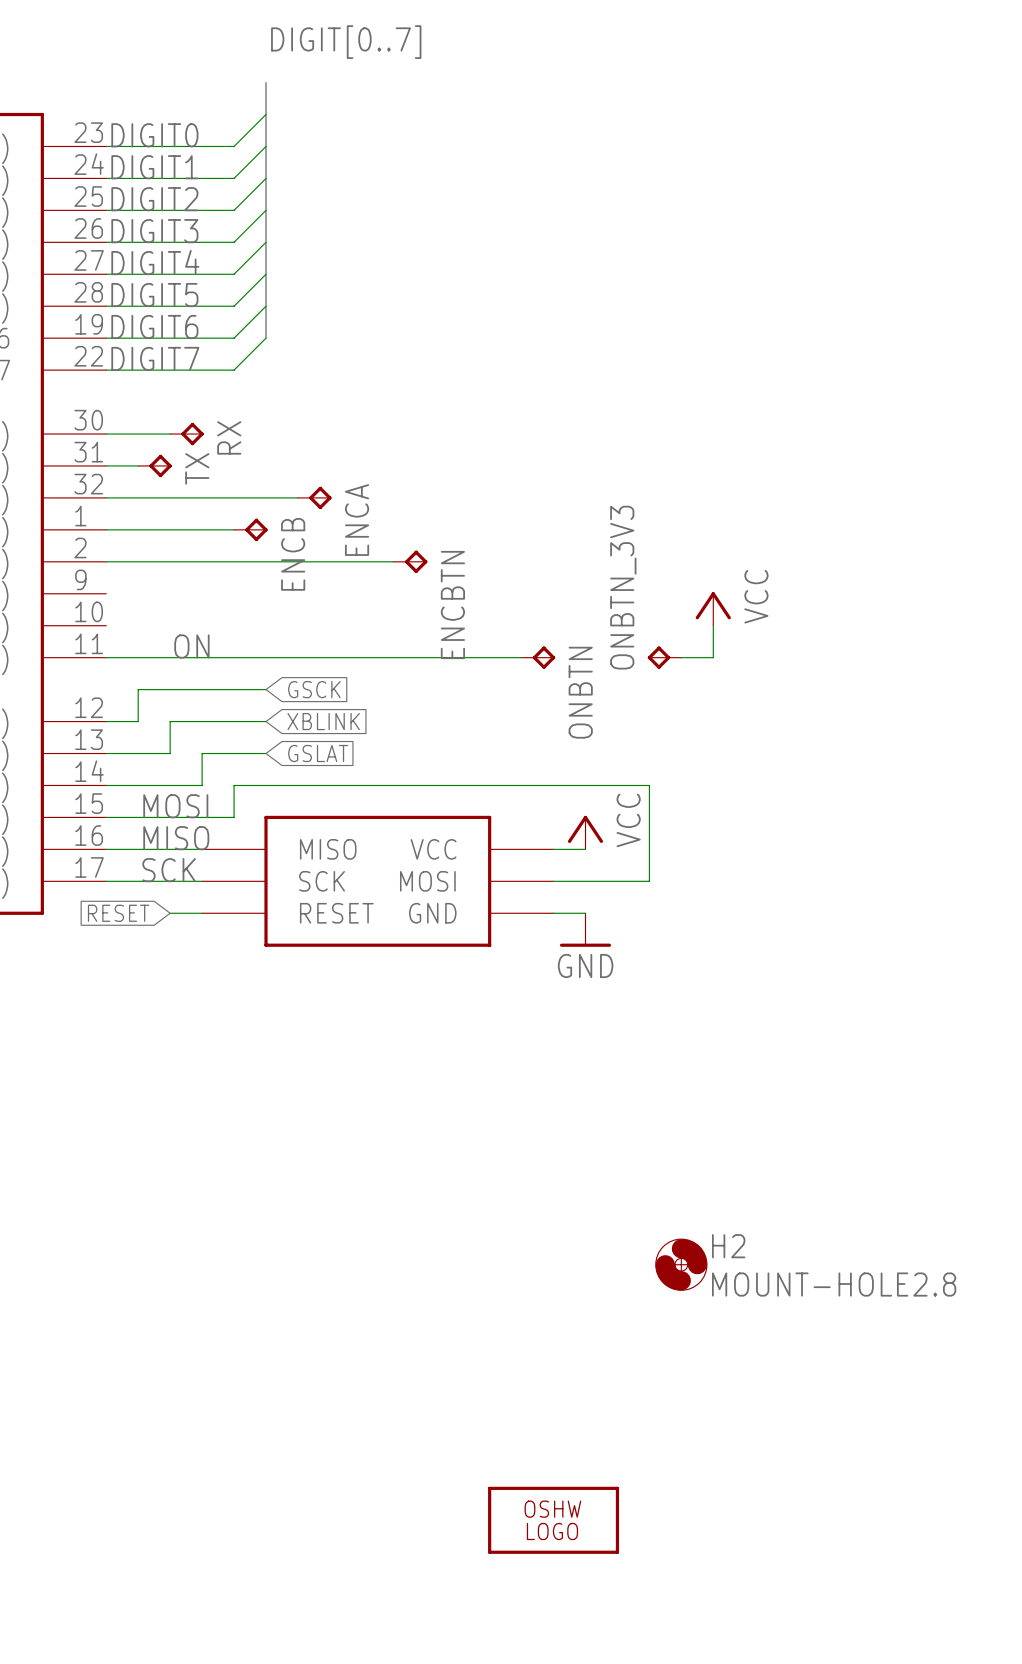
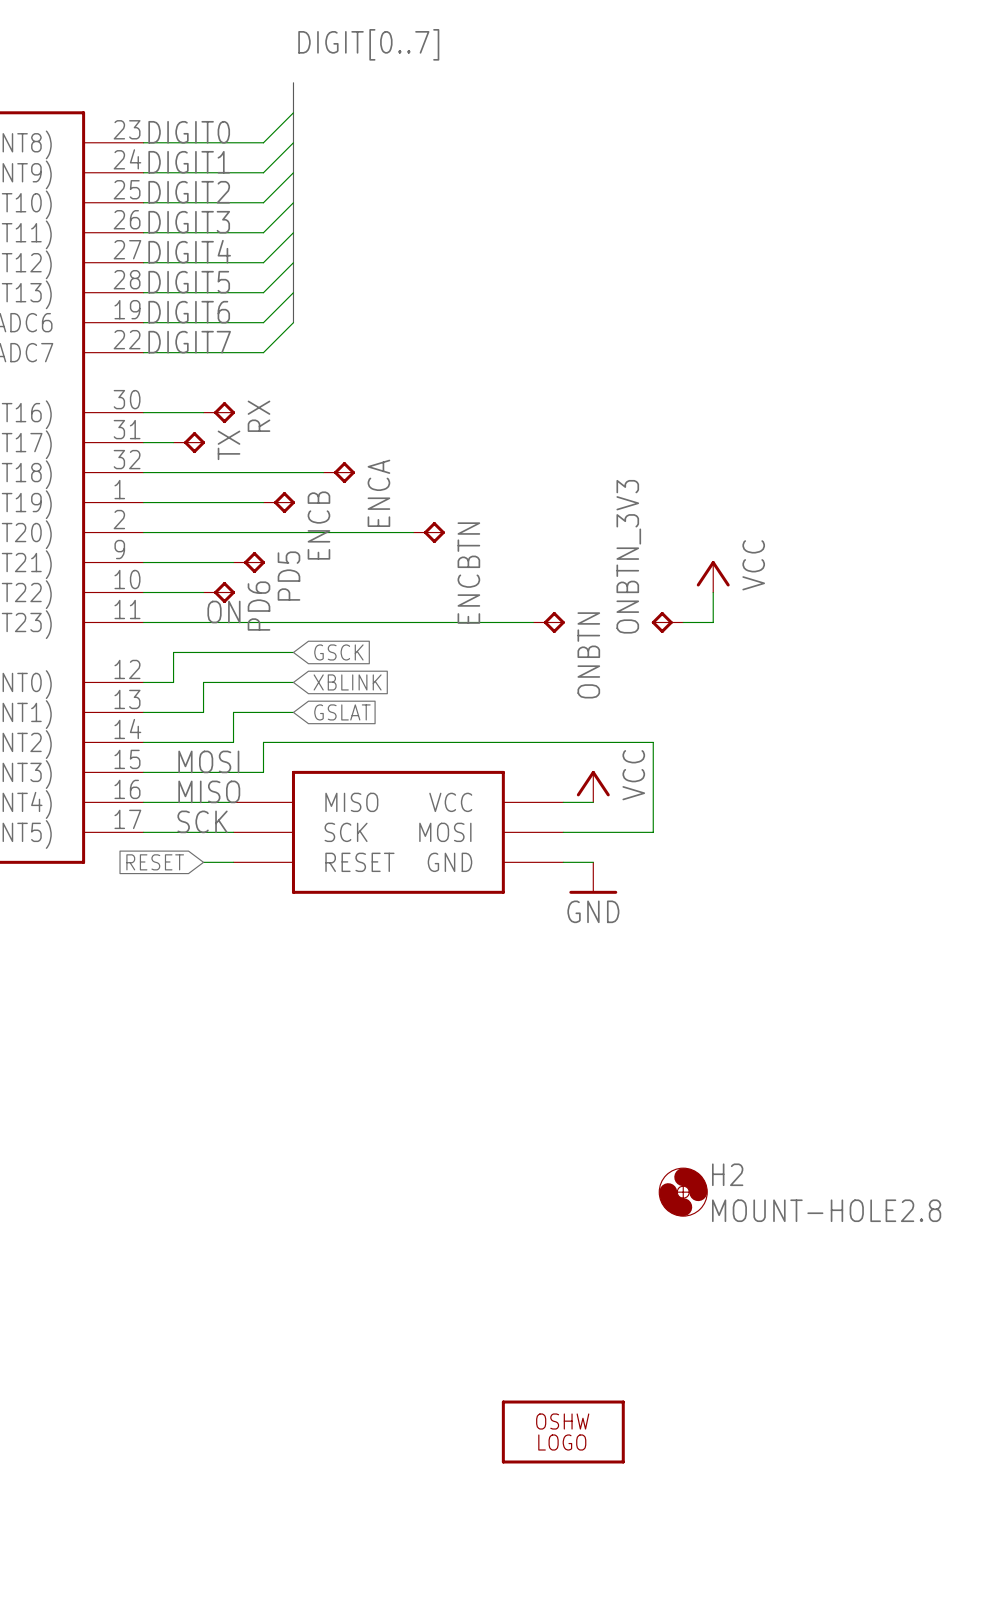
wire: none -> (143, 562) (233, 562)
PD5: none -> (249, 562)
wire: none -> (143, 592) (203, 592)
PD6: none -> (219, 592)

